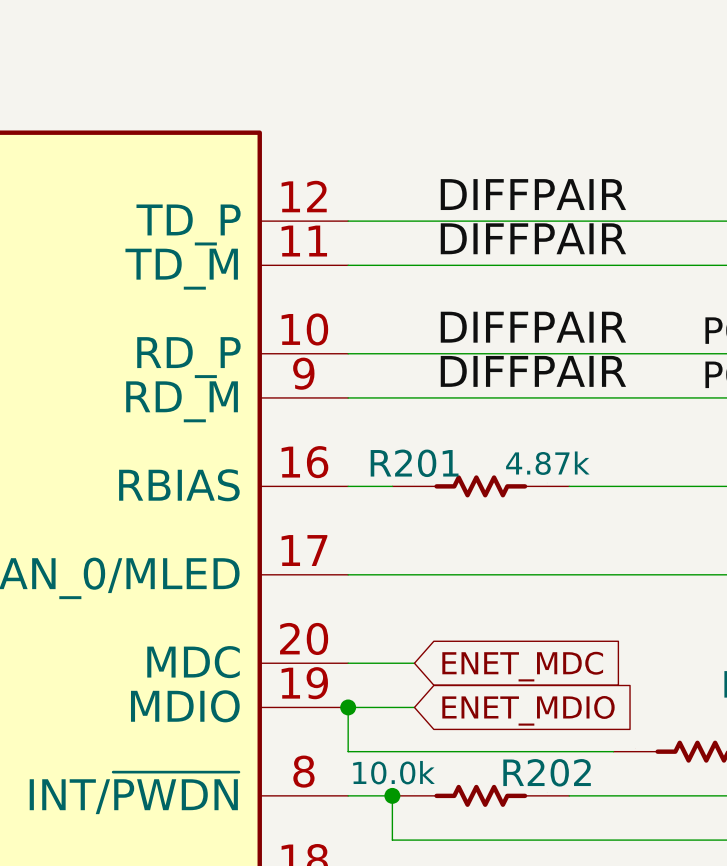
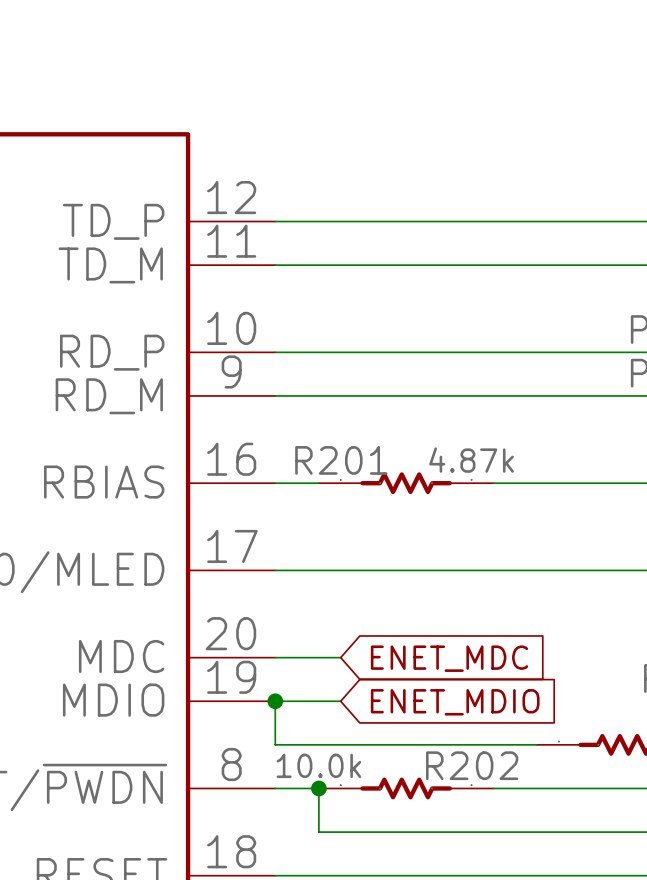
label: DIFFPAIR (533, 194) -> none
label: DIFFPAIR (533, 238) -> none
label: DIFFPAIR (533, 327) -> none
label: DIFFPAIR (533, 371) -> none

